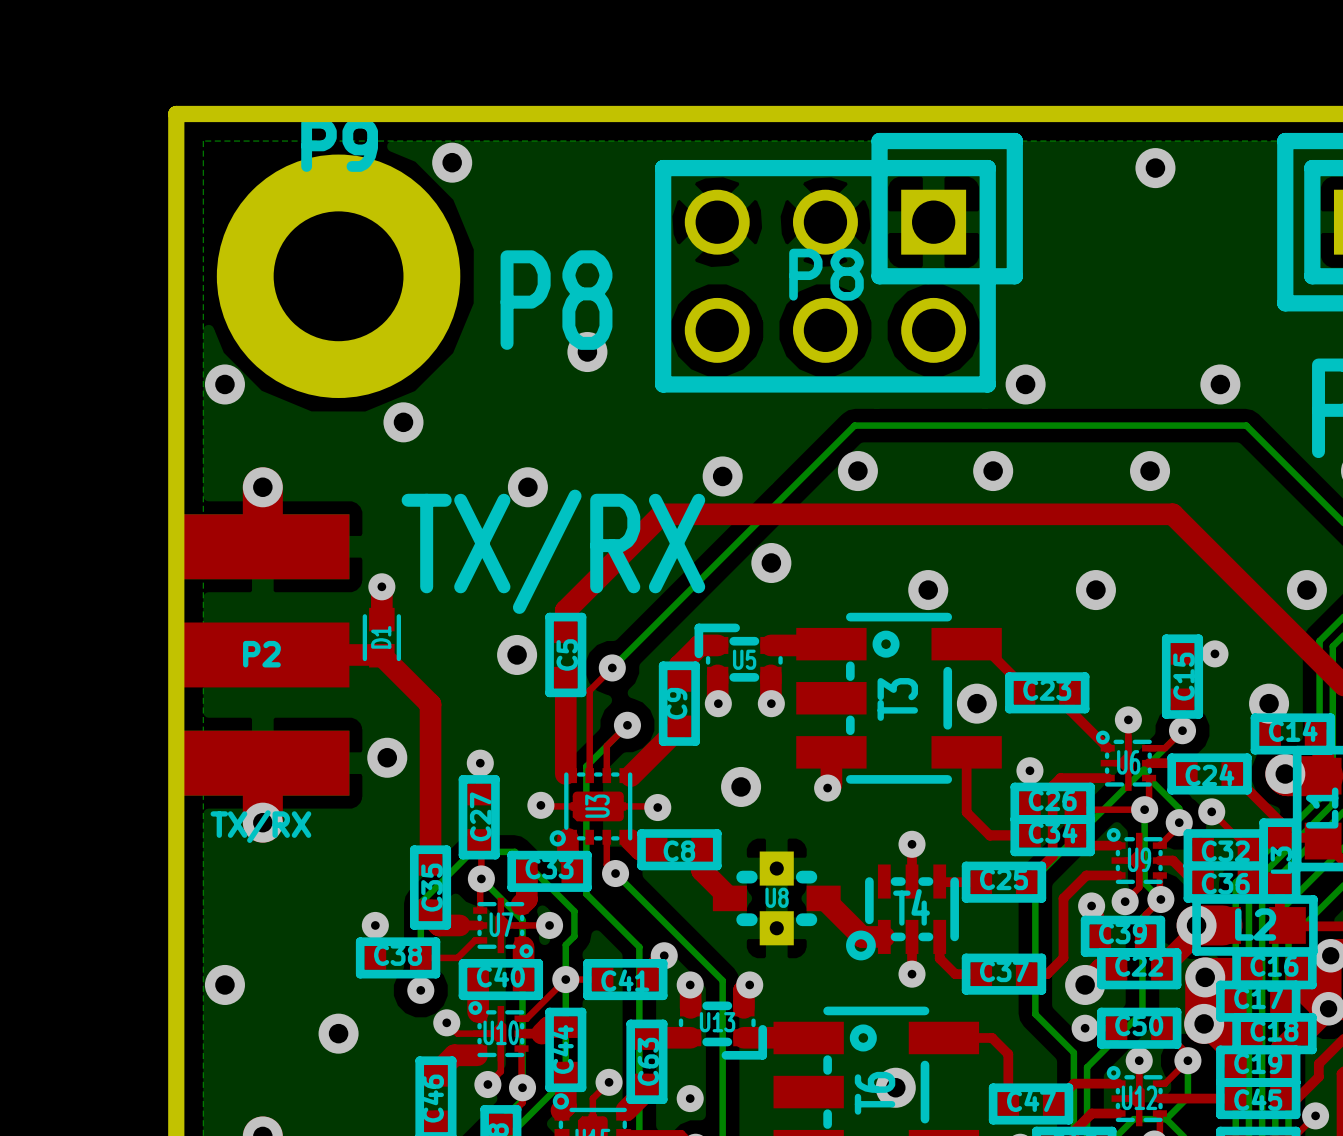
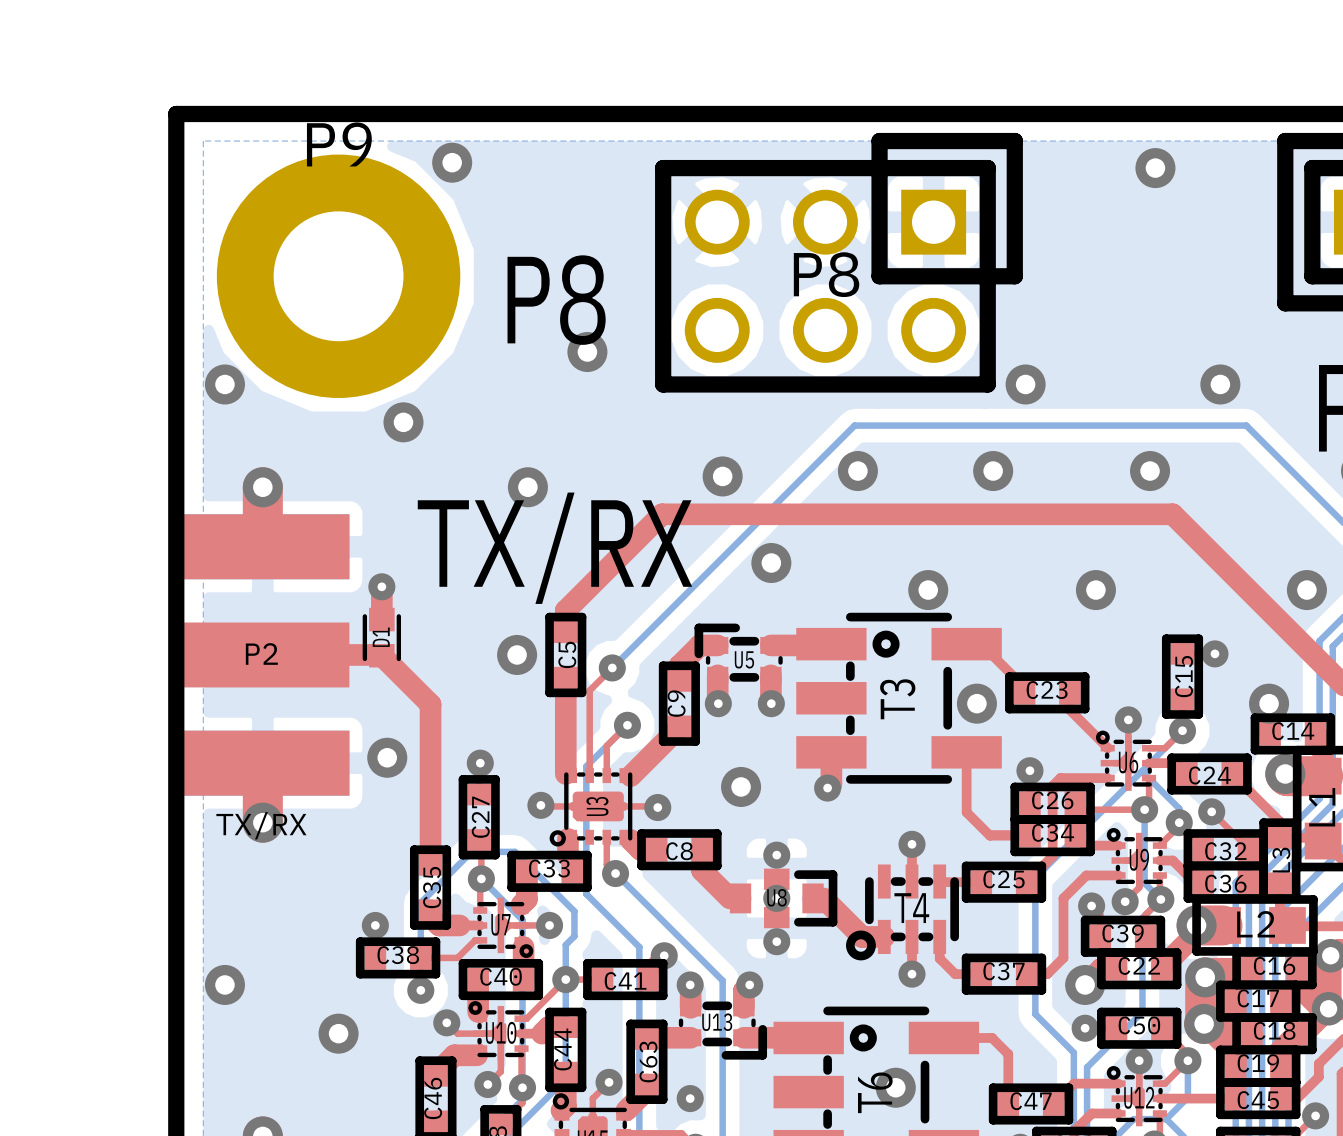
U8 footprint: [712, 851, 841, 946] -> [729, 868, 838, 929]
via: none -> (776, 855)
via: none -> (776, 898)
via: none -> (776, 941)

